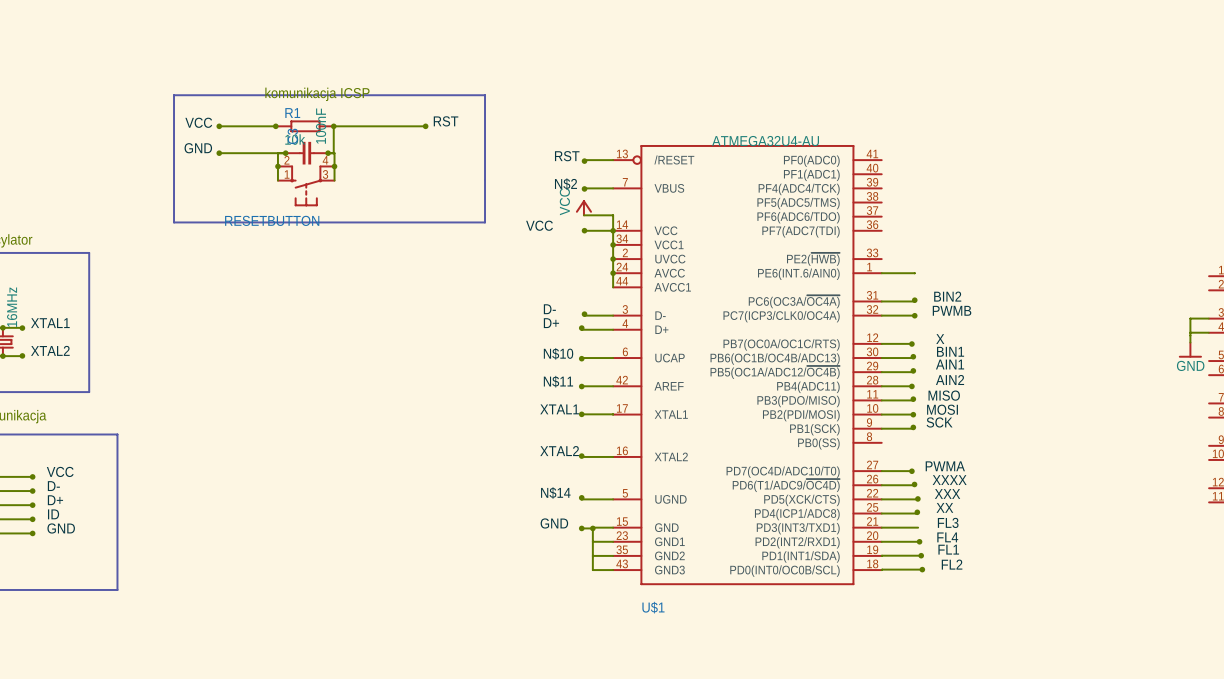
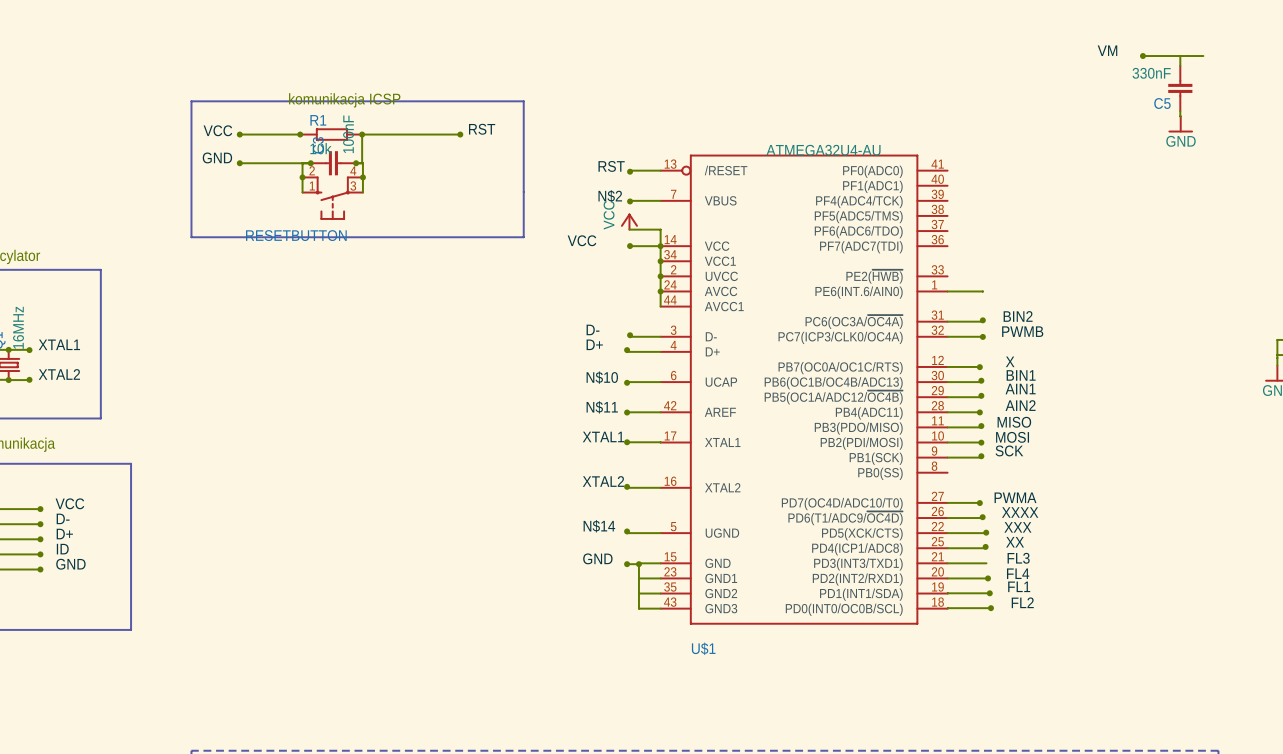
label: none -> VM (1107, 50)
wire: none -> (1142, 56) (1203, 56)
junction: none -> (1142, 56)
wire: none -> (1180, 56) (1180, 65)
C5: none -> 330nF (1180, 88)
wire: none -> (1180, 111) (1180, 116)
power symbol: none -> GND (1180, 124)

